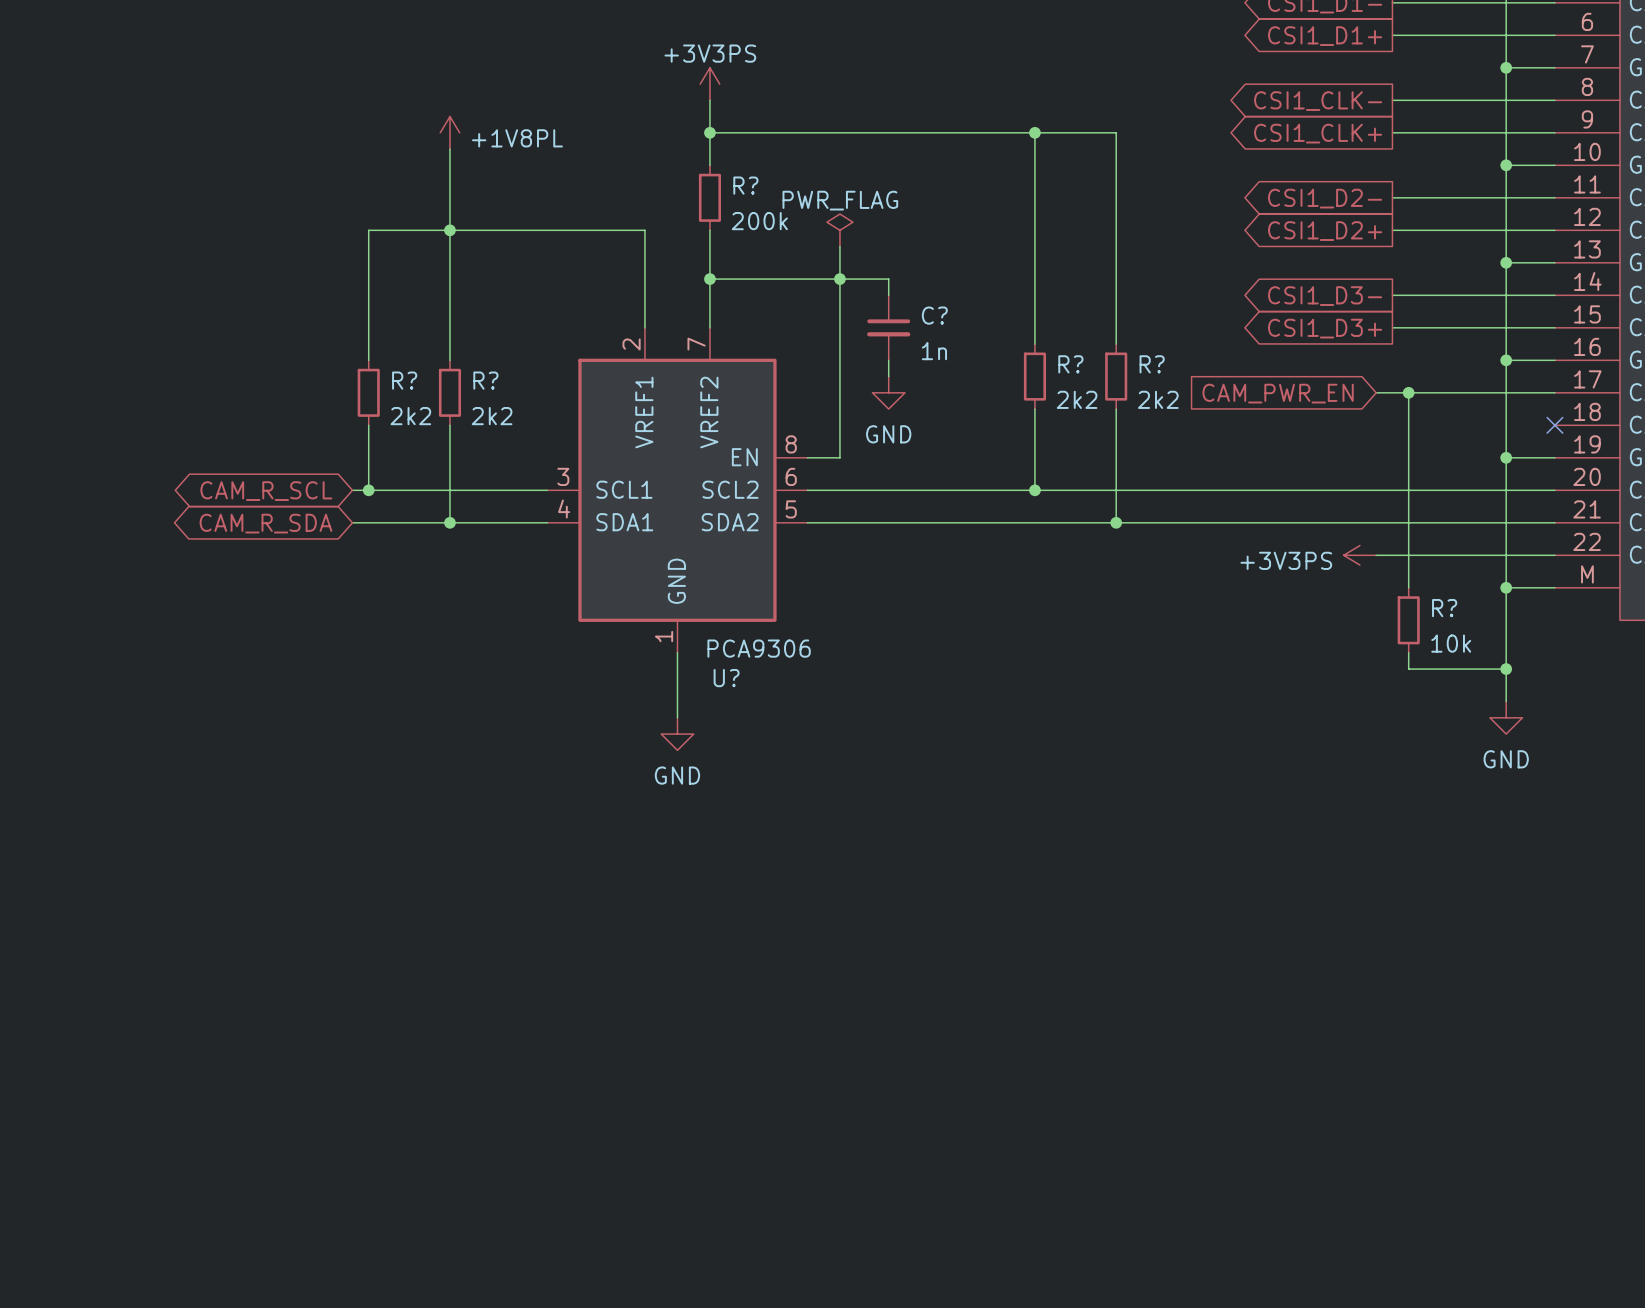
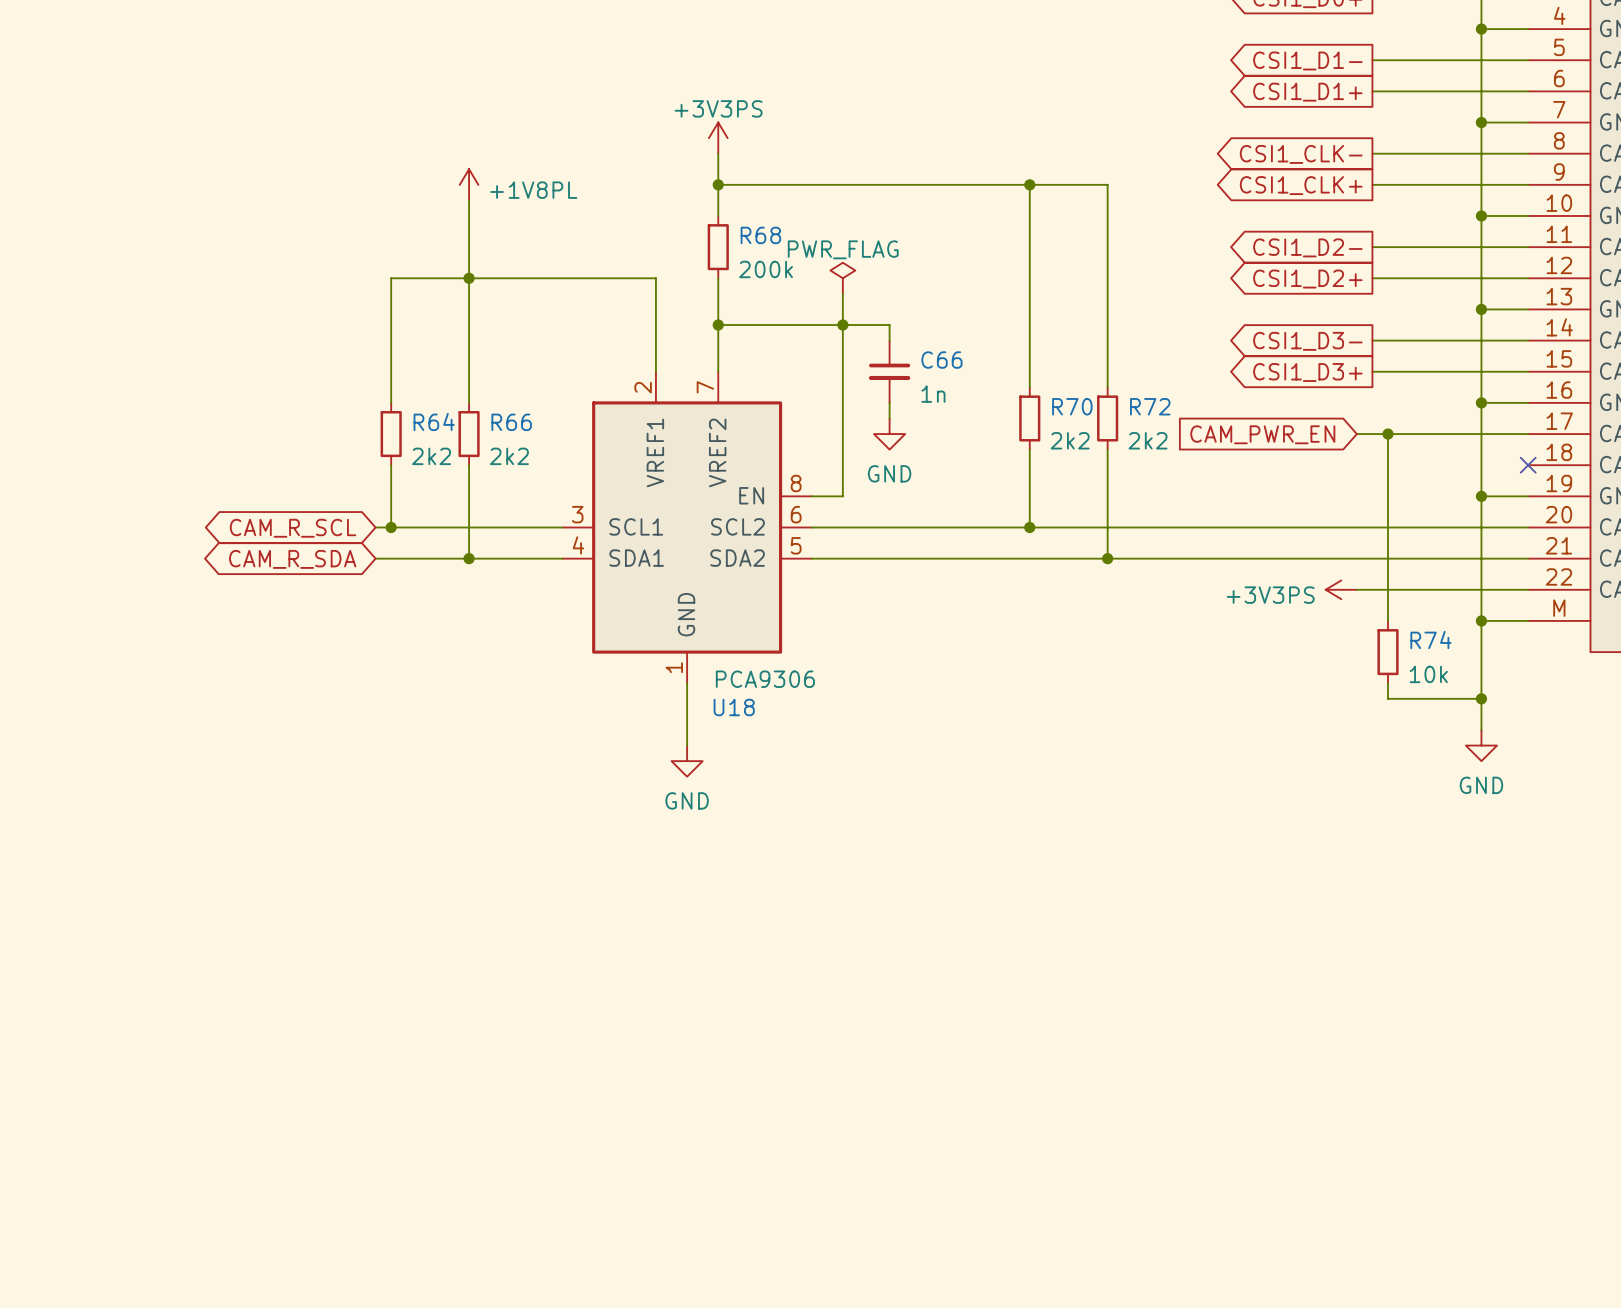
R? name: R? (745, 185) -> R68 (760, 235)
C? name: C? (934, 315) -> C66 (941, 360)
R? name: R? (1070, 364) -> R70 (1072, 406)
R? name: R? (1152, 364) -> R72 (1150, 406)
R? name: R? (404, 380) -> R64 (434, 421)
R? name: R? (485, 380) -> R66 (511, 422)
R? name: R? (1444, 608) -> R74 (1430, 640)
U? name: U? (726, 678) -> U18 (734, 707)

